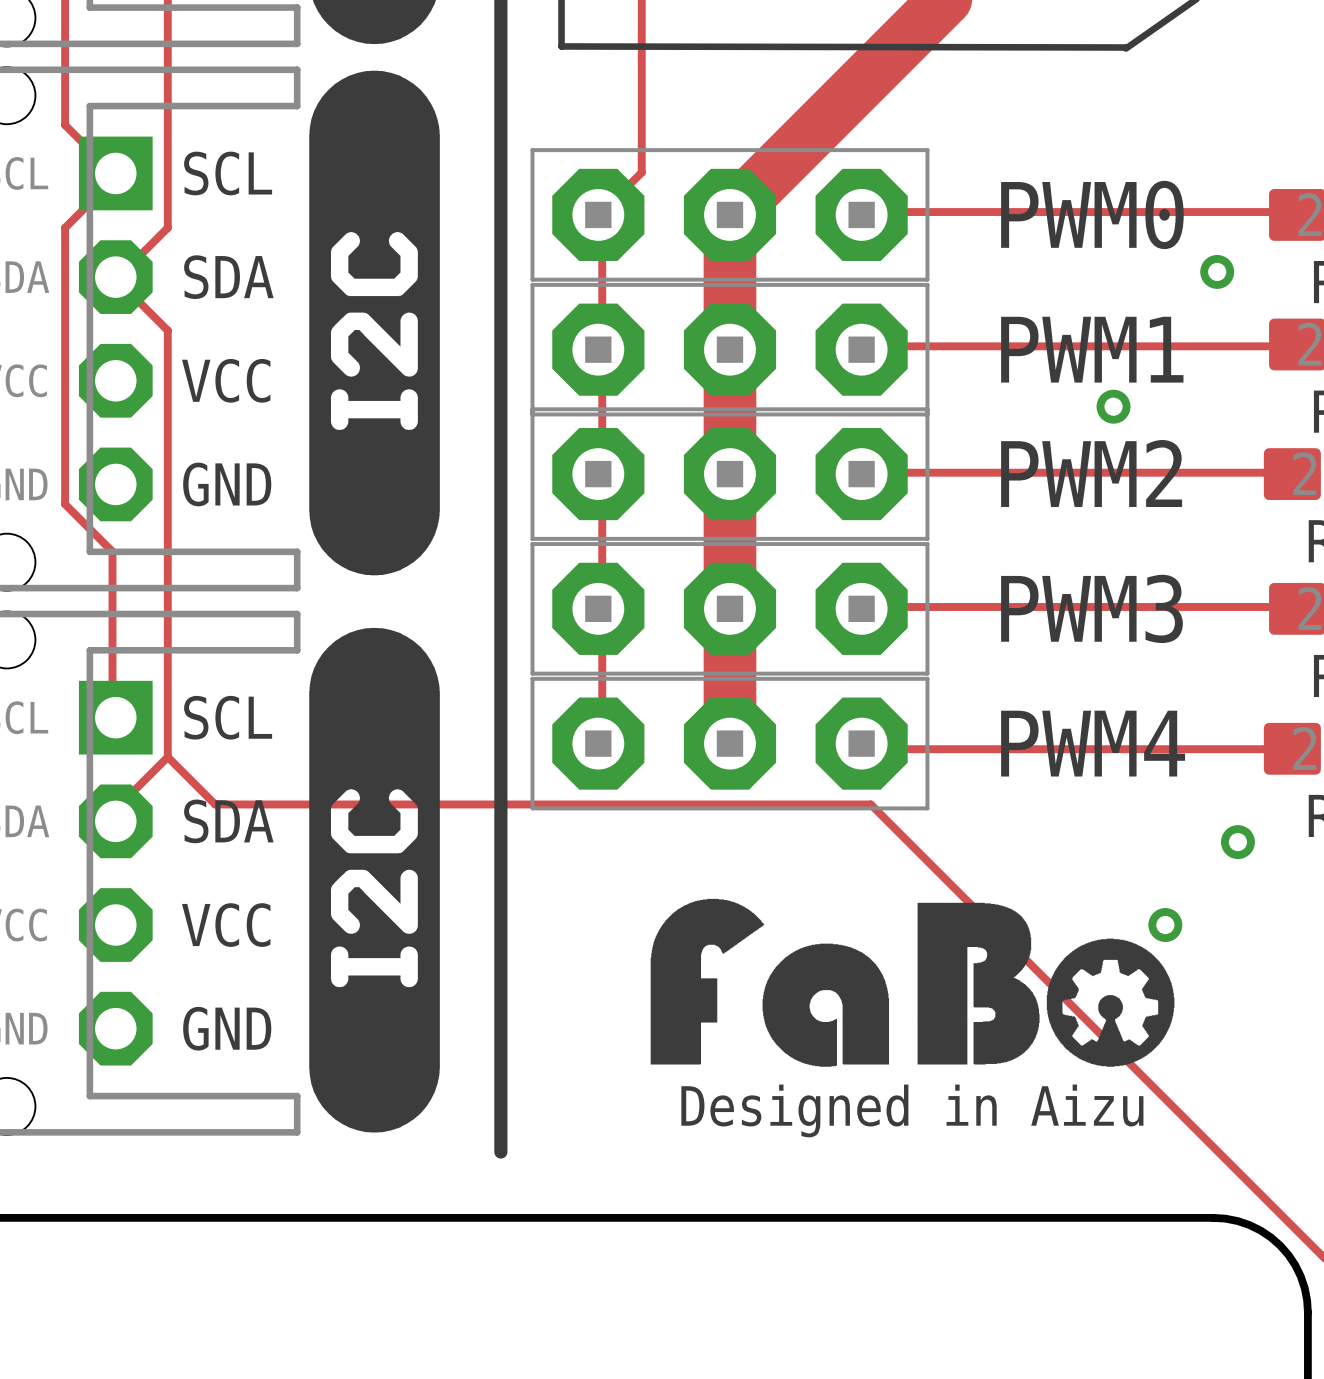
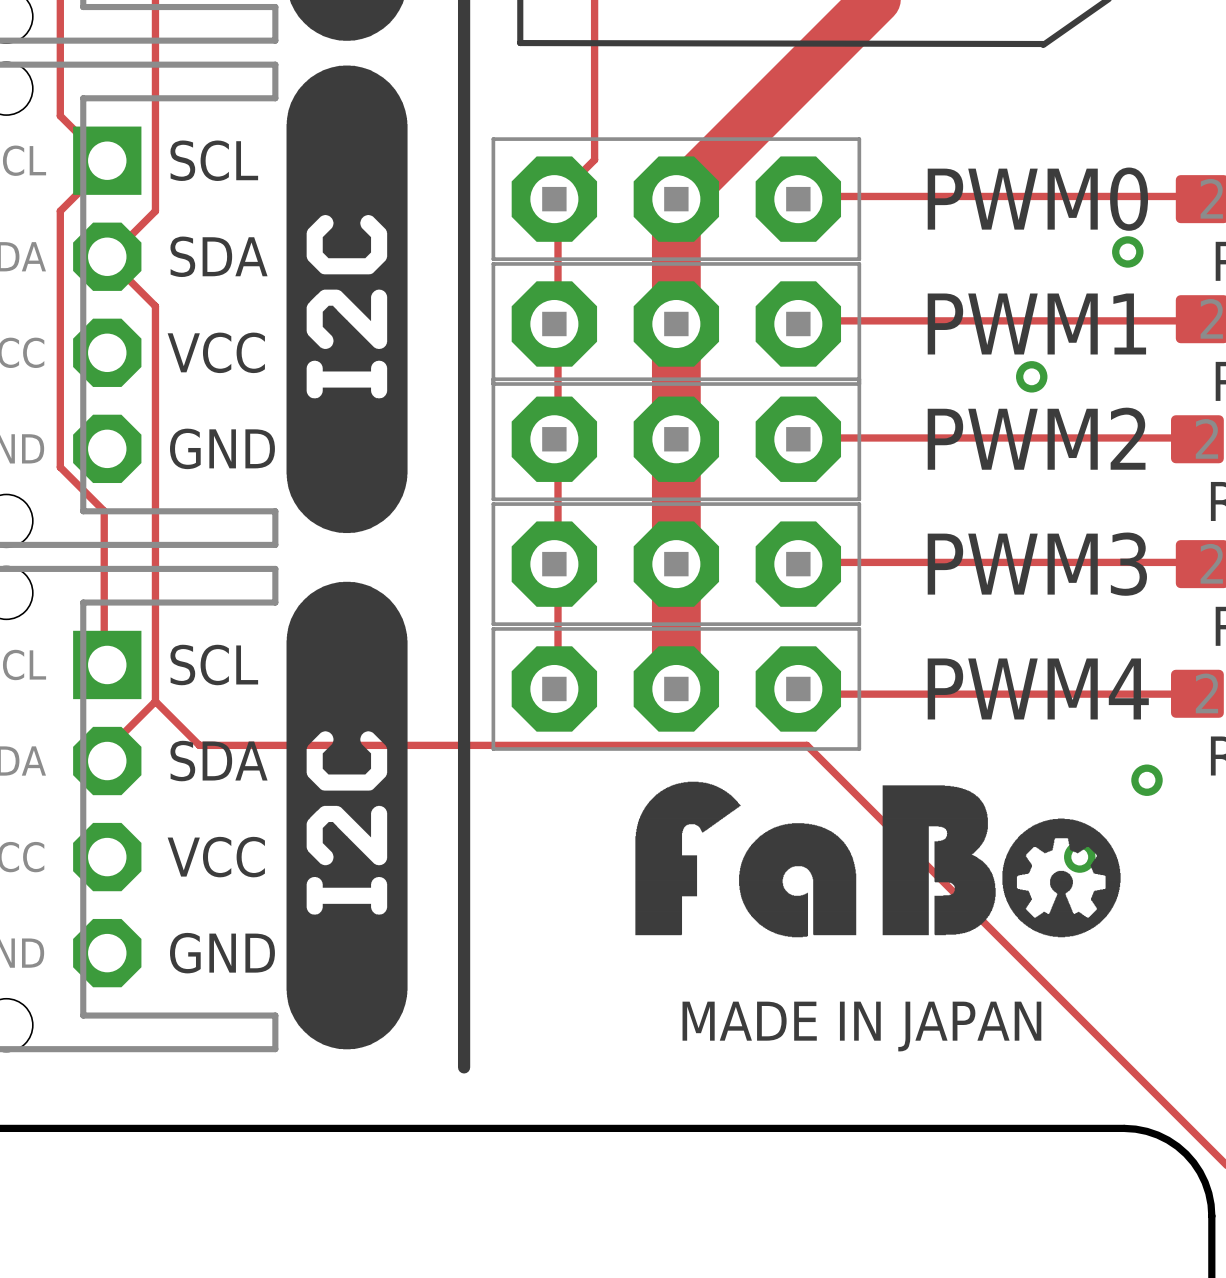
drawing position: (912, 982) -> (877, 859)
text: Designed in Aizu (912, 1110) -> MADE IN JAPAN (861, 1026)

